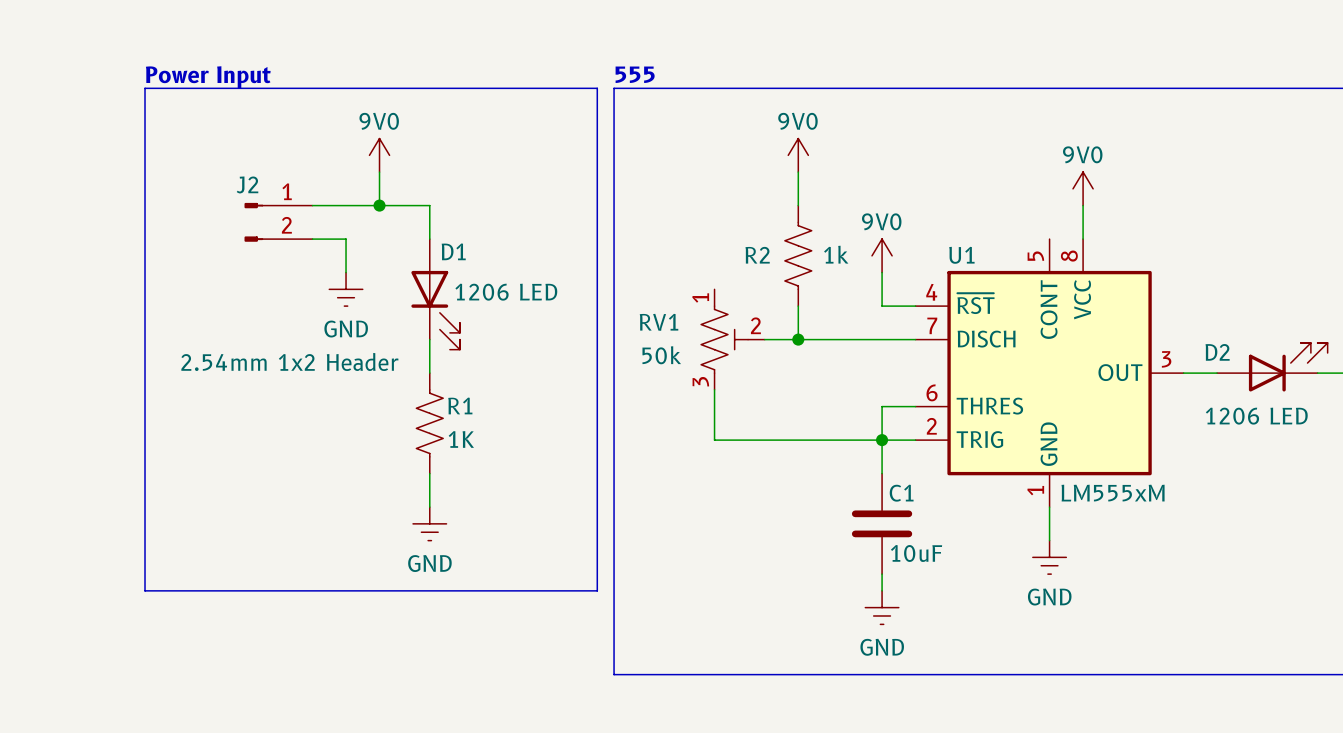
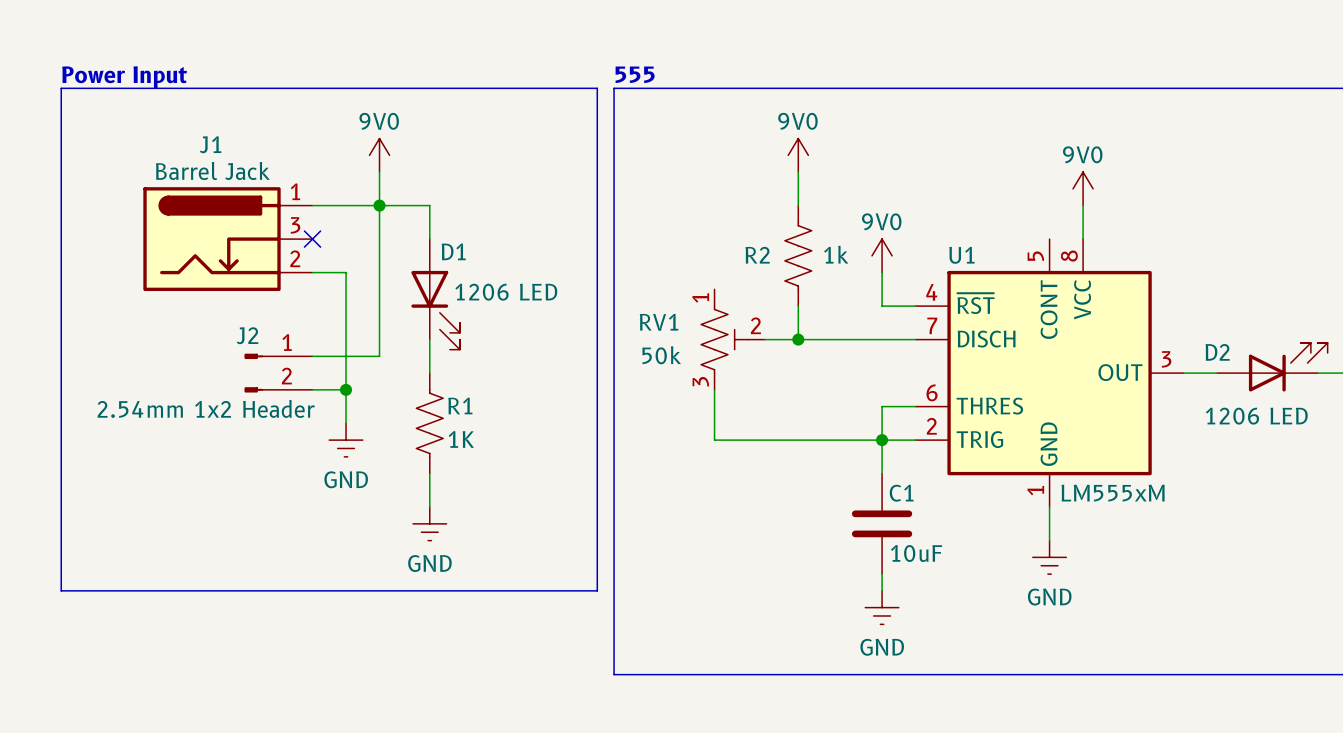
text position: Power Input (208, 77) -> Power Input (124, 77)
line: (145, 88) (145, 590) -> (145, 88) (61, 88) (61, 590) (145, 590)
wire: none -> (379, 205) (379, 356) (312, 356)
J2 position: (278, 222) -> (278, 373)
J1: none -> Barrel Jack (227, 239)
wire: (312, 239) (346, 239) (346, 272) -> none
no-connect mark: none -> (312, 239)
wire: none -> (312, 272) (346, 272) (346, 423)
power symbol position: GND (346, 289) -> GND (346, 440)
J2 value position: 2.54mm 1x2 Header (289, 361) -> 2.54mm 1x2 Header (206, 408)
wire: none -> (312, 389) (346, 389)
junction: none -> (346, 389)

